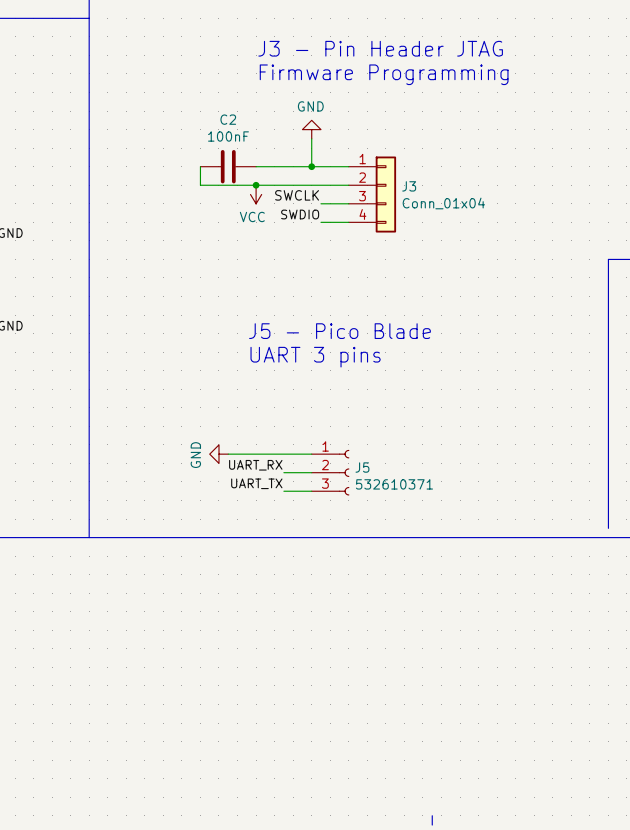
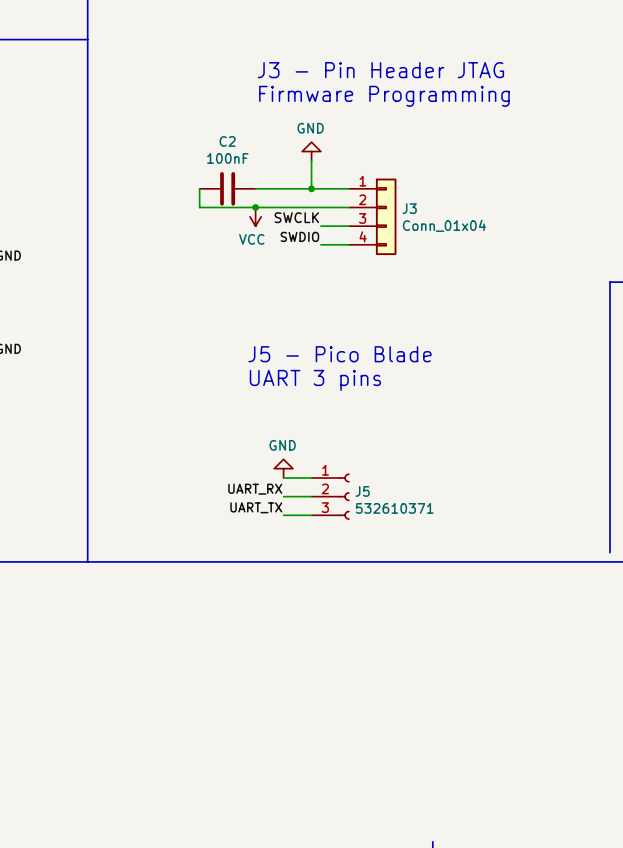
power symbol rotation: 0° (218, 454) -> 90° clockwise (283, 468)
power symbol position: GND (218, 454) -> GND (283, 468)
wire: (228, 454) (283, 454) -> none

